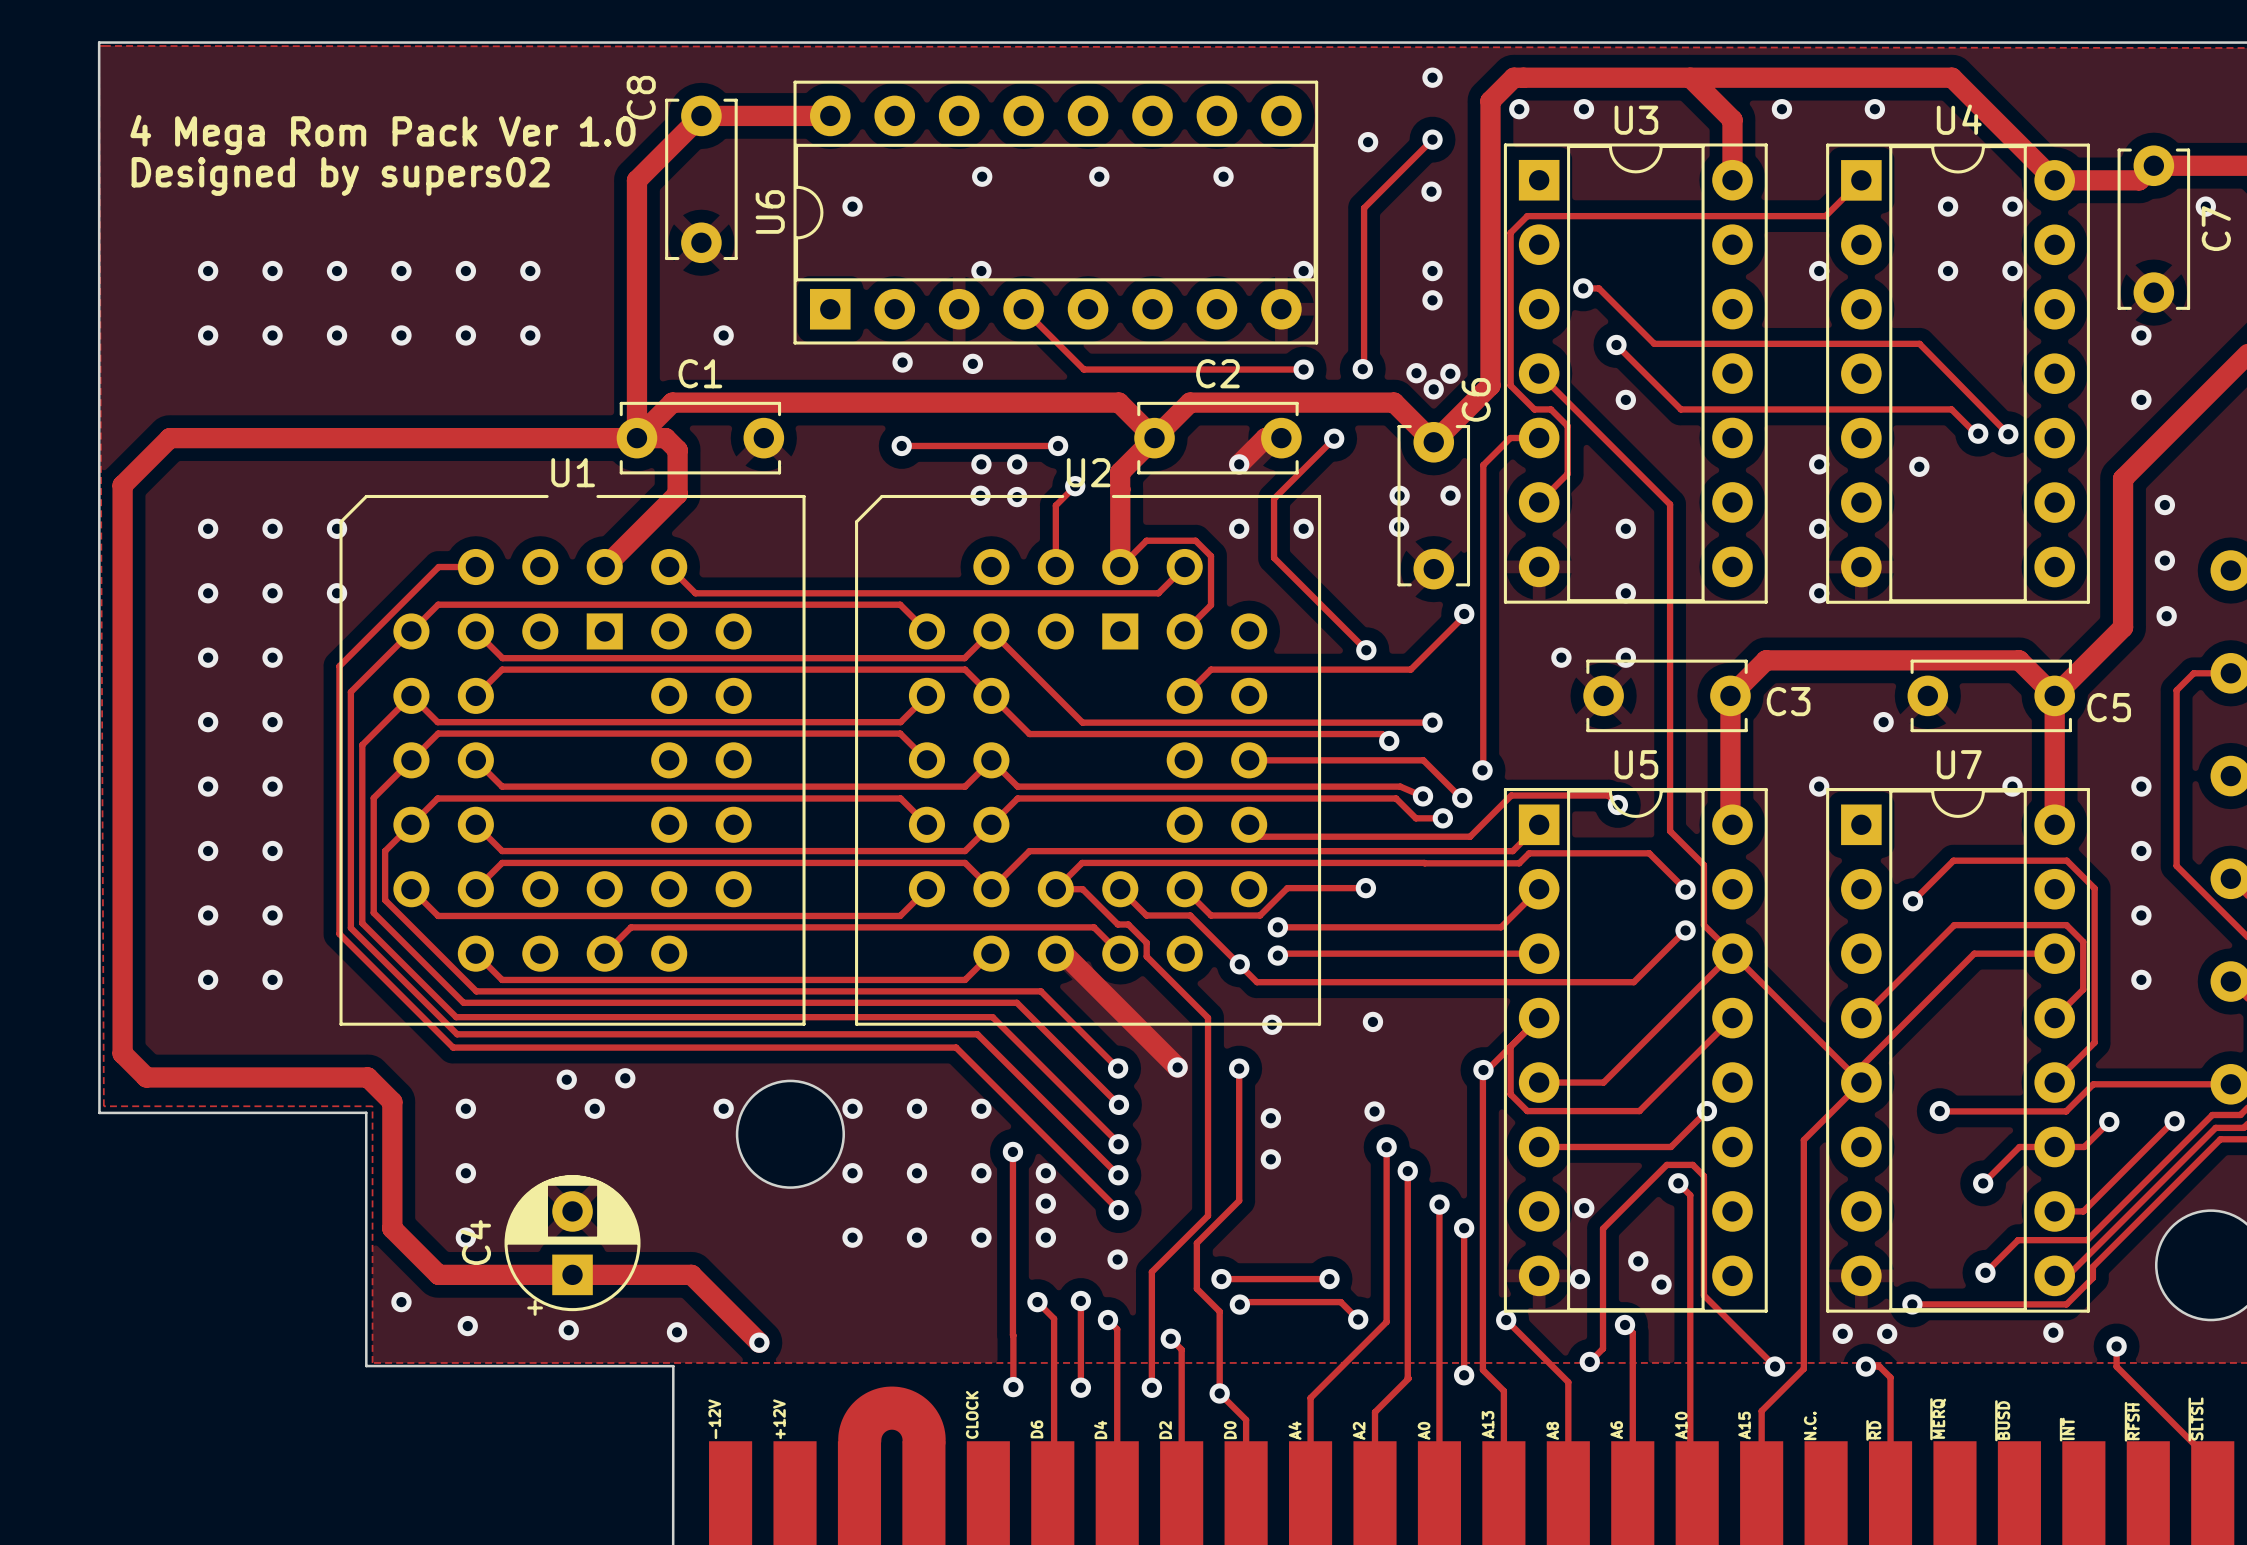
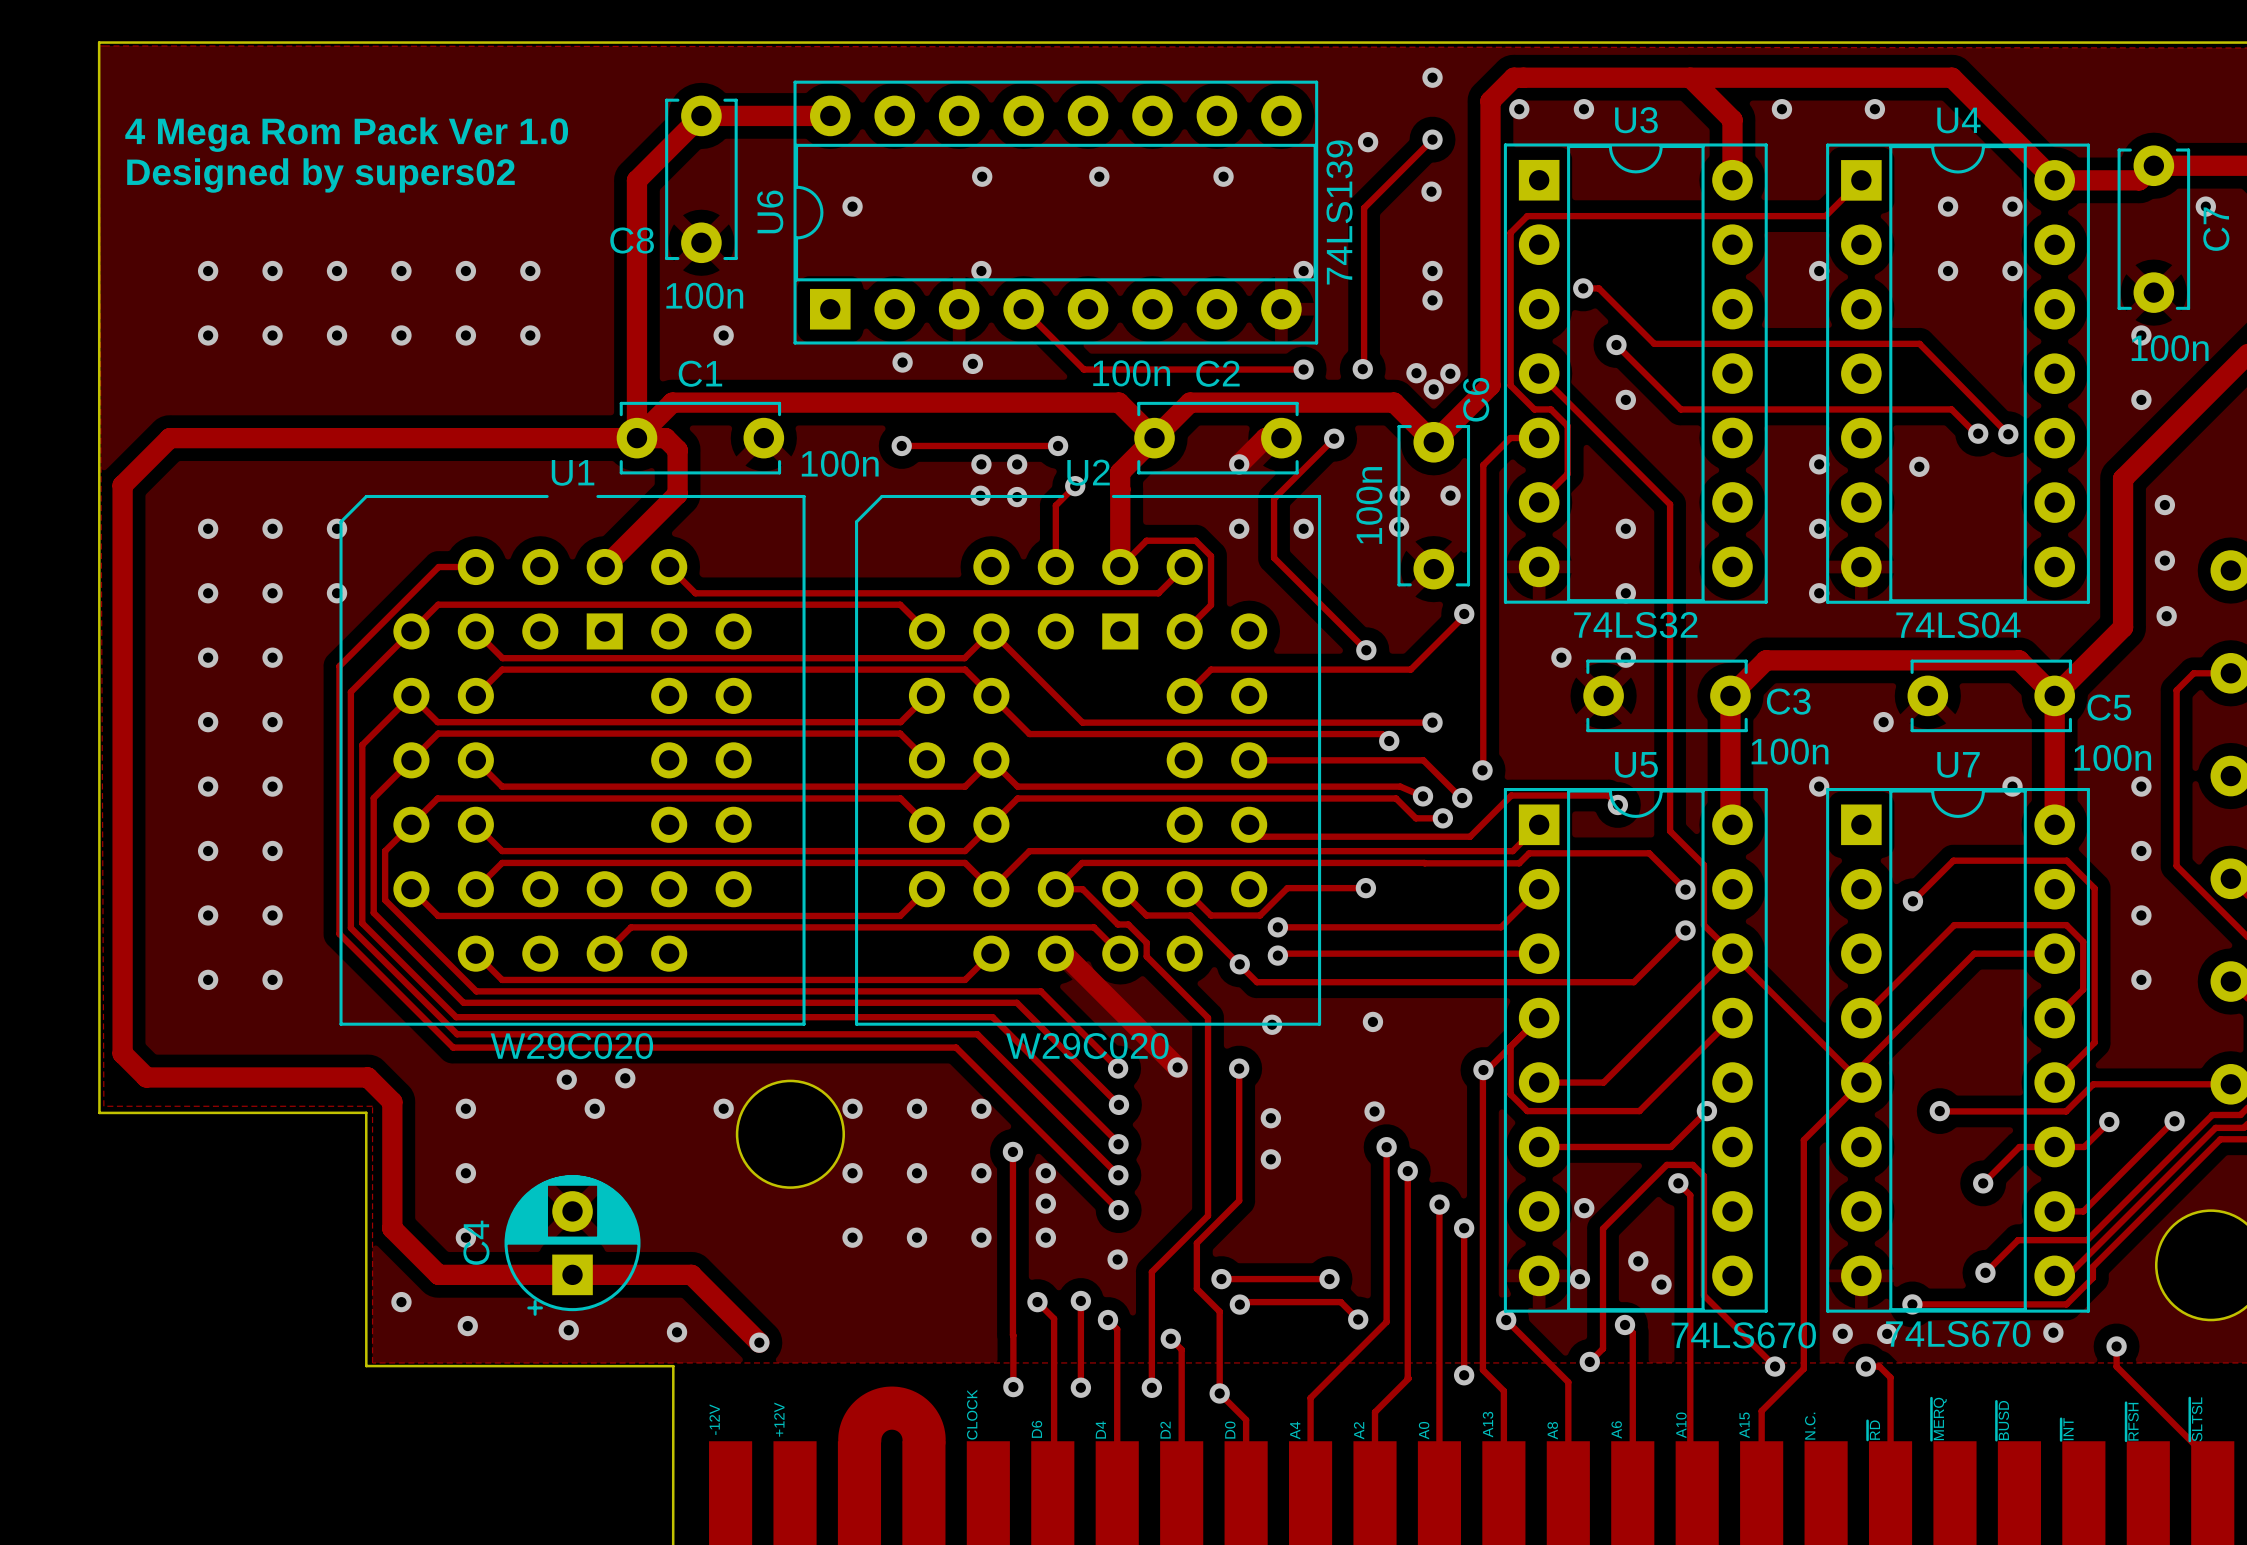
C8 name rotation: 0° (641, 97) -> 90° clockwise (632, 240)
C8 name position: C8 (641, 97) -> C8 (632, 240)
U6 value: none -> 74LS139 (1339, 212)
C8 value: none -> 100n (704, 295)
C7 value: none -> 100n (2170, 348)
C2 value: none -> 100n (1131, 373)
C1 value: none -> 100n (840, 463)
C6 value: none -> 100n (1369, 505)
U3 value: none -> 74LS32 (1635, 625)
U4 value: none -> 74LS04 (1958, 625)
C3 value: none -> 100n (1790, 751)
C5 value: none -> 100n (2112, 757)
U1 value: none -> W29C020 (571, 1046)
U2 value: none -> W29C020 (1087, 1046)
U7 value: none -> 74LS670 (1958, 1334)
U5 value: none -> 74LS670 (1743, 1335)

